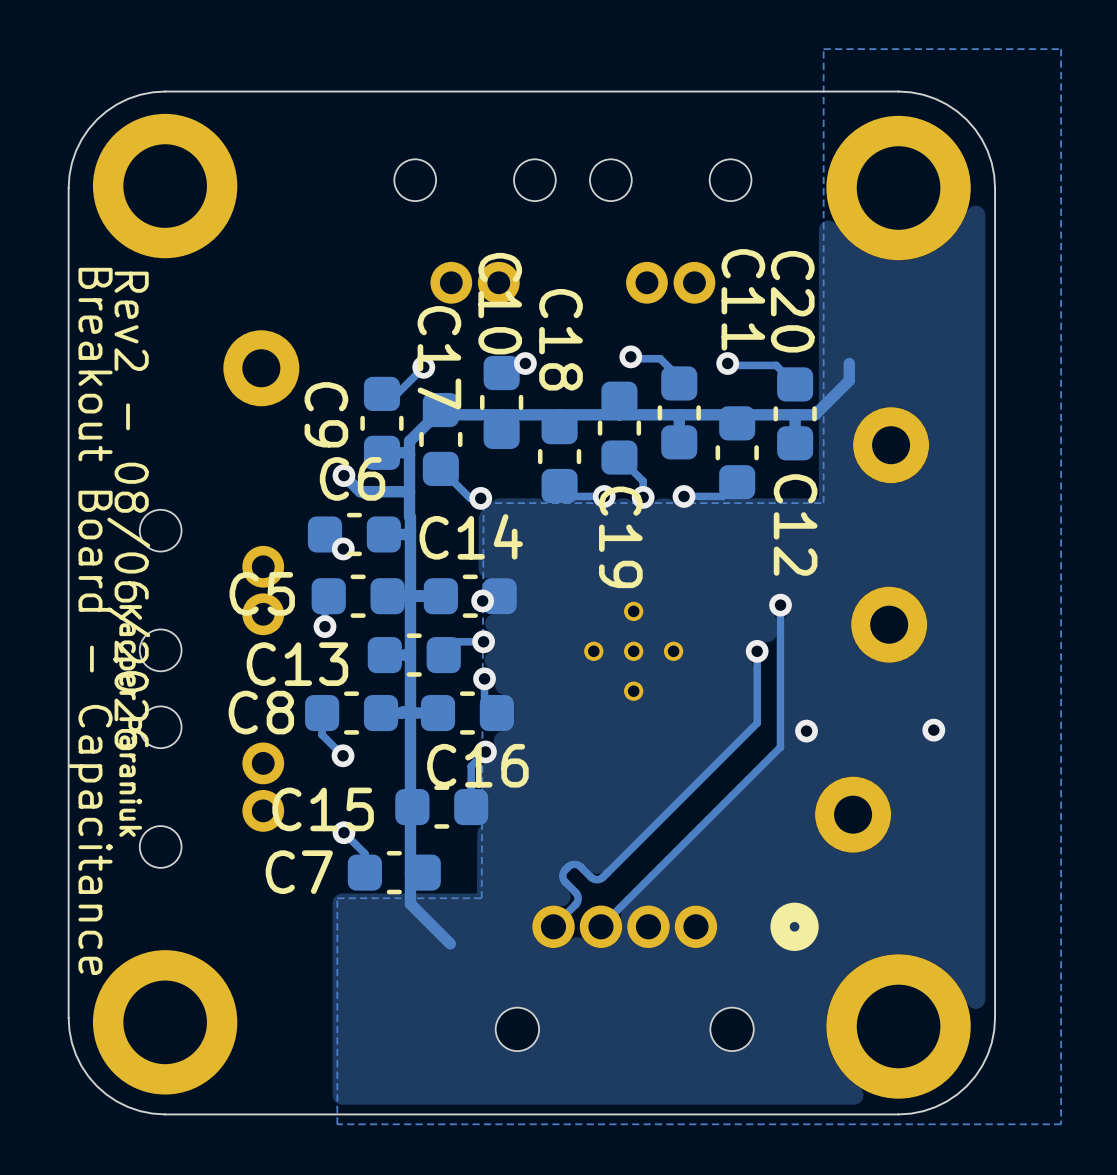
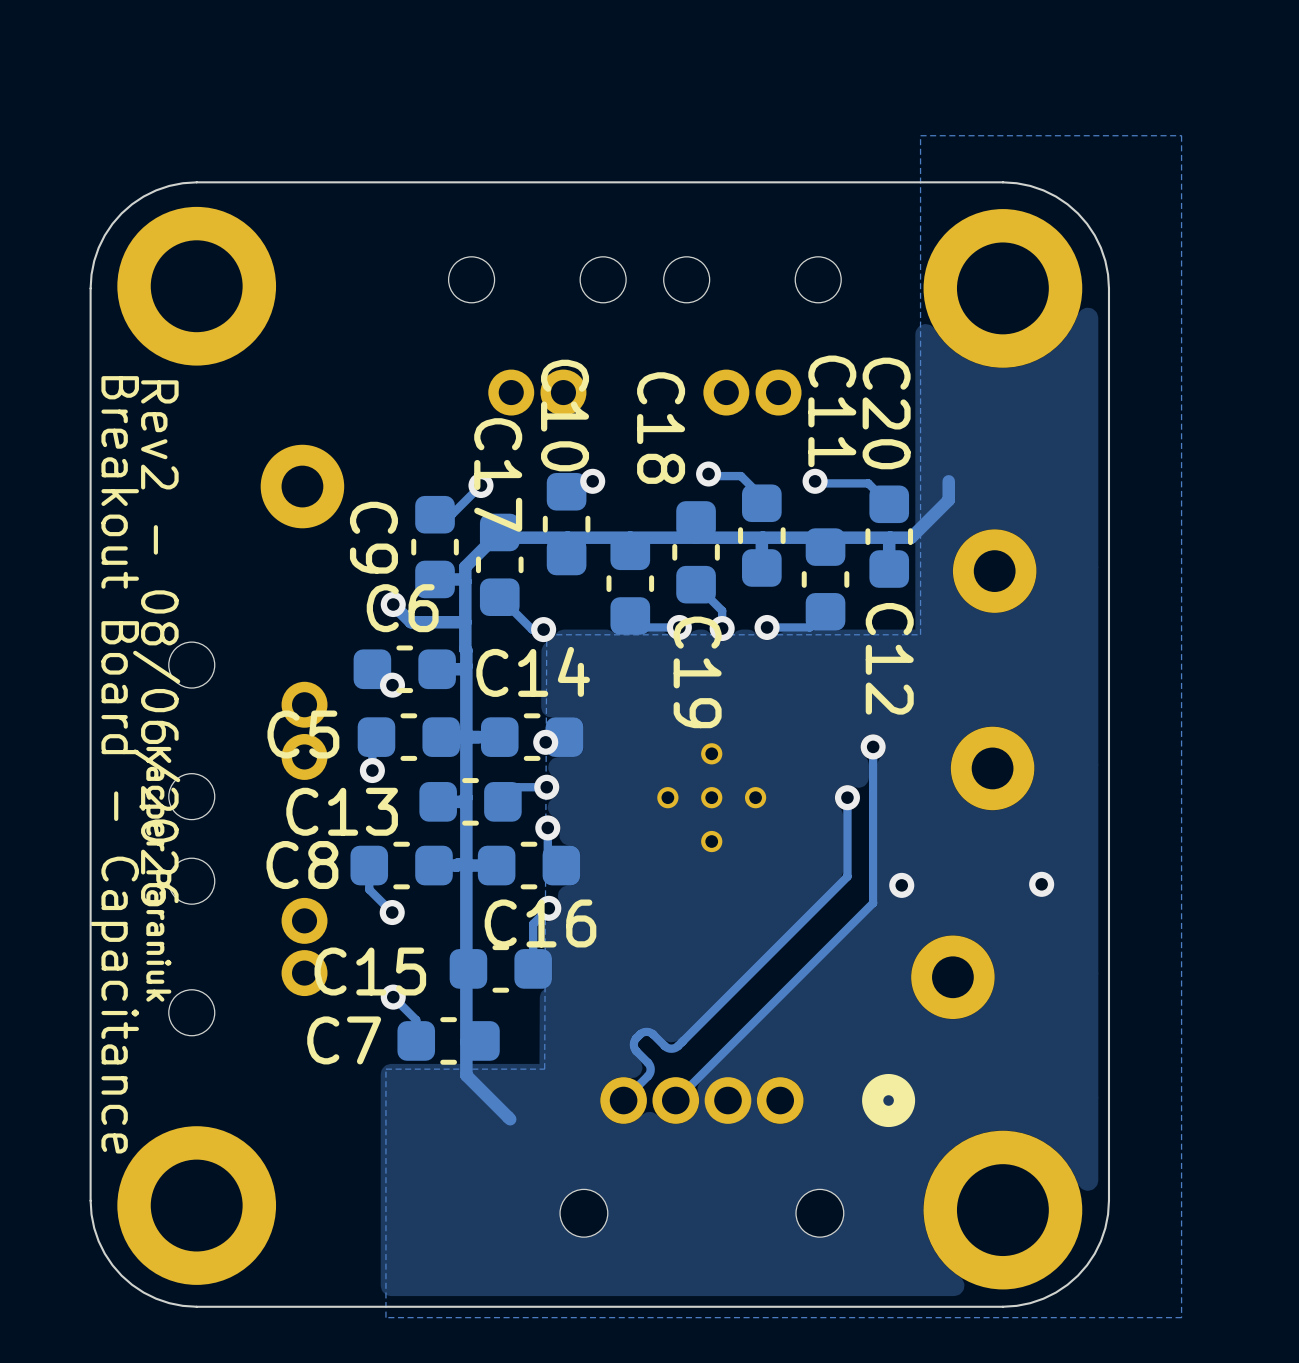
C18 name position: C18 (561, 339) -> C18 (661, 428)

